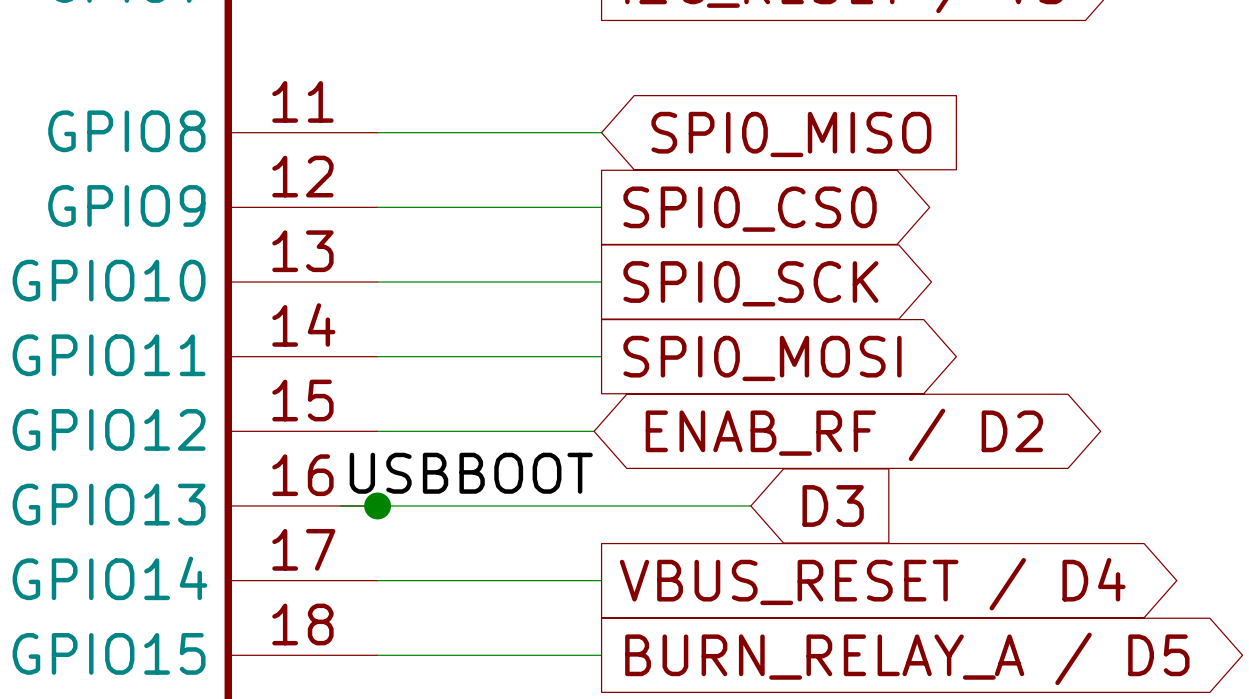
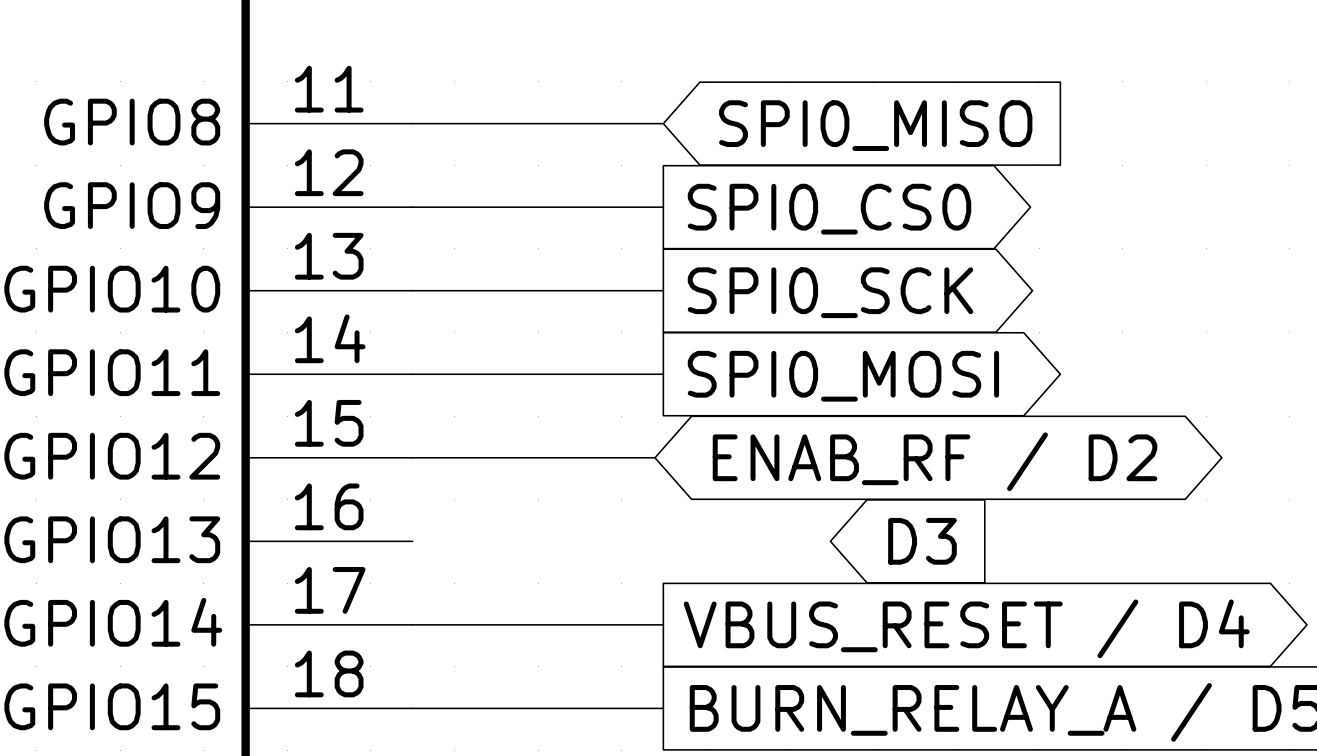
label: USBBOOT (471, 473) -> none
wire: (340, 505) (750, 505) -> none
junction: (377, 505) -> none

